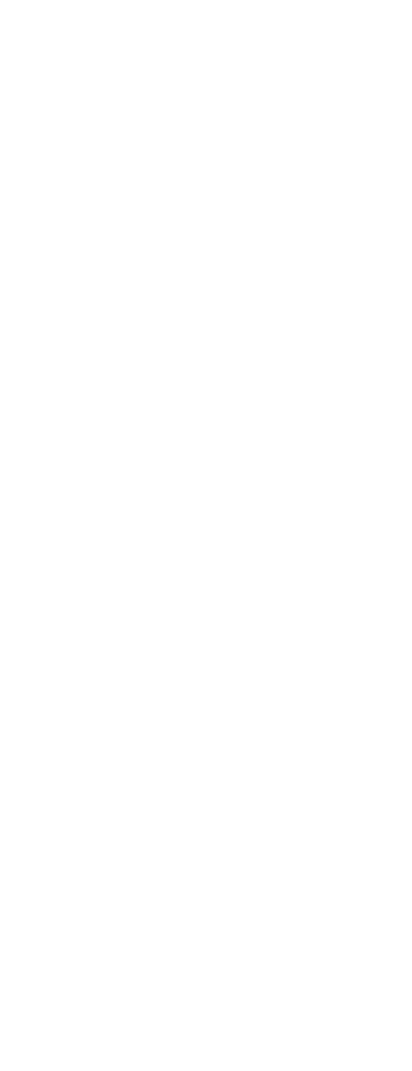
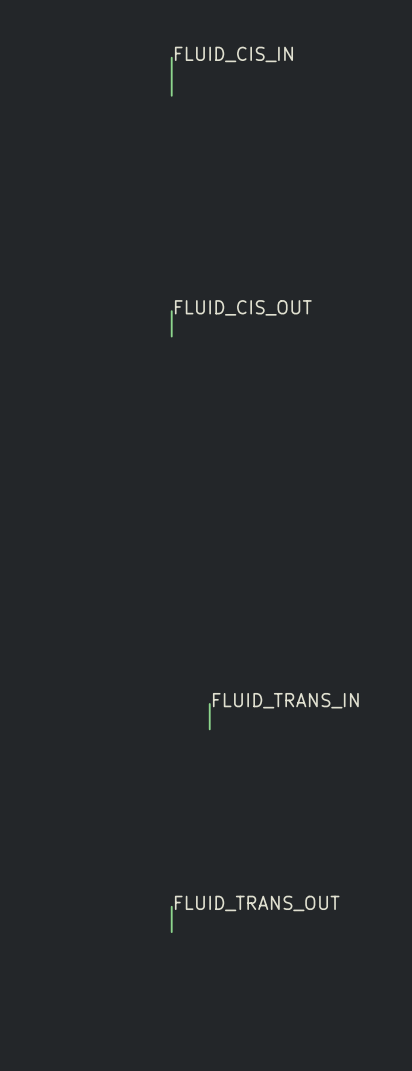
label: none -> FLUID_CIS_IN (233, 54)
wire: none -> (171, 57) (171, 95)
label: none -> FLUID_CIS_OUT (243, 307)
wire: none -> (171, 311) (171, 336)
label: none -> FLUID_TRANS_IN (285, 700)
wire: none -> (209, 704) (209, 729)
label: none -> FLUID_TRANS_OUT (257, 903)
wire: none -> (171, 906) (171, 932)

